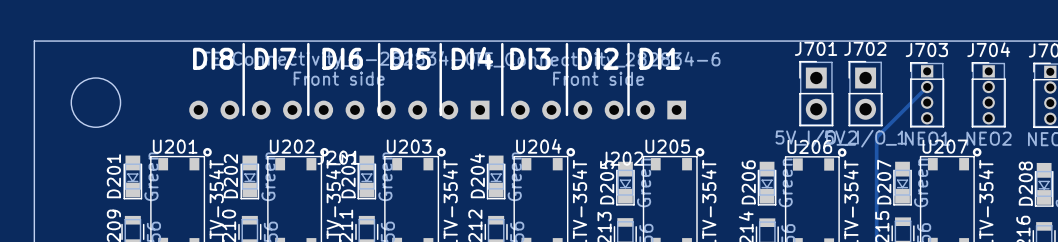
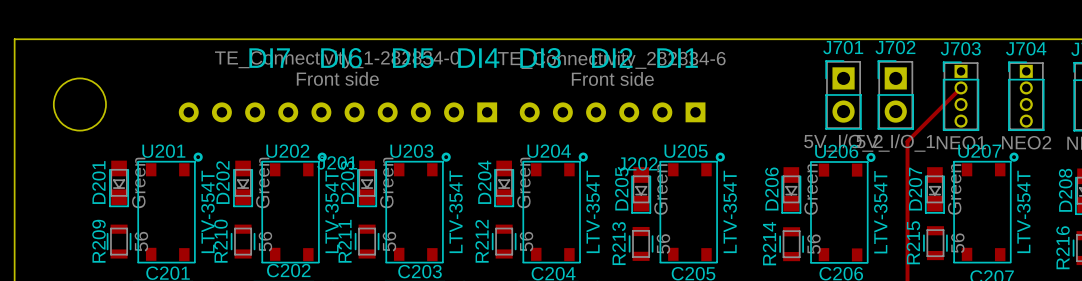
line: (243, 44) (243, 114) -> none
line: (308, 44) (308, 114) -> none
line: (379, 44) (379, 114) -> none
line: (440, 44) (440, 114) -> none
line: (502, 44) (502, 114) -> none
line: (566, 44) (566, 114) -> none
line: (628, 44) (628, 114) -> none
text: DI8 (213, 58) -> none

